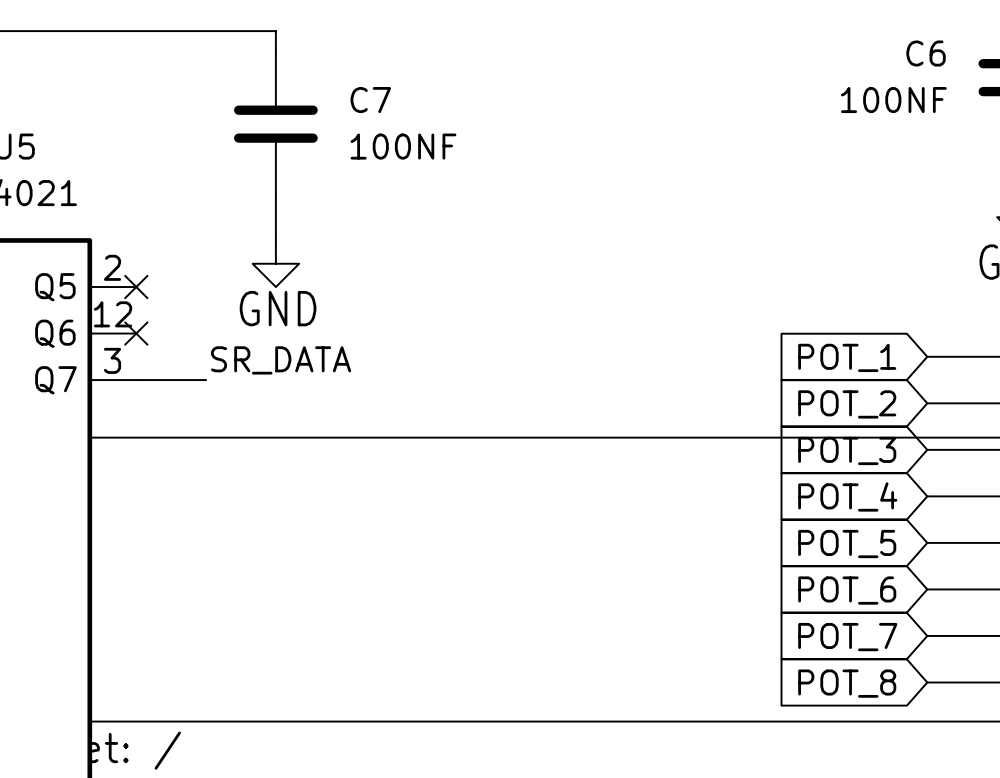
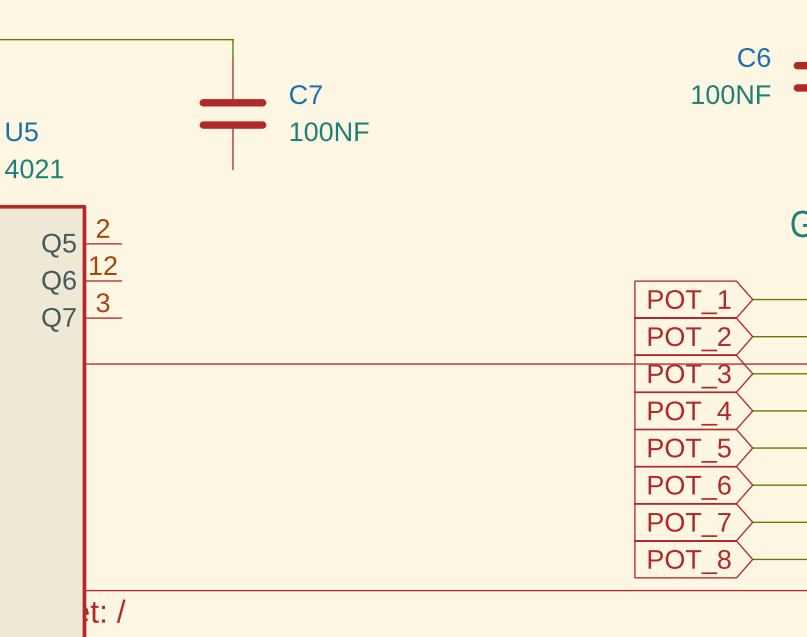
wire: (275, 193) (275, 240) -> none
power symbol: GND (275, 263) -> none
no-connect mark: (136, 287) -> none
no-connect mark: (136, 333) -> none
label: SR_DATA (281, 360) -> none
wire: (136, 380) (206, 380) -> none

